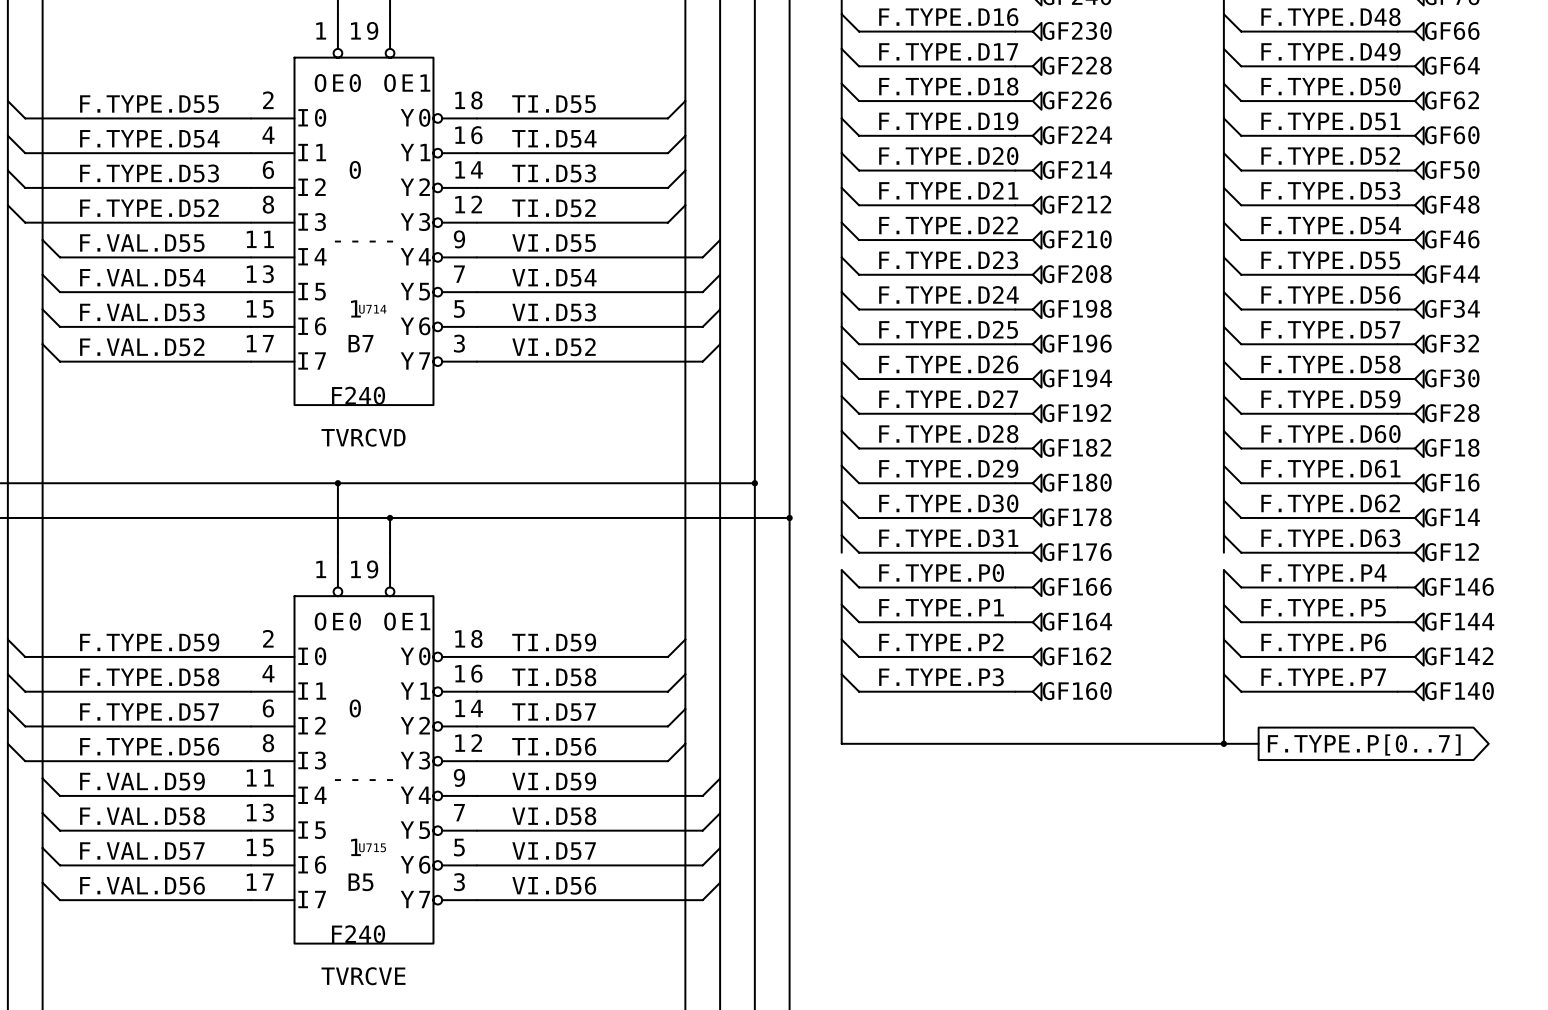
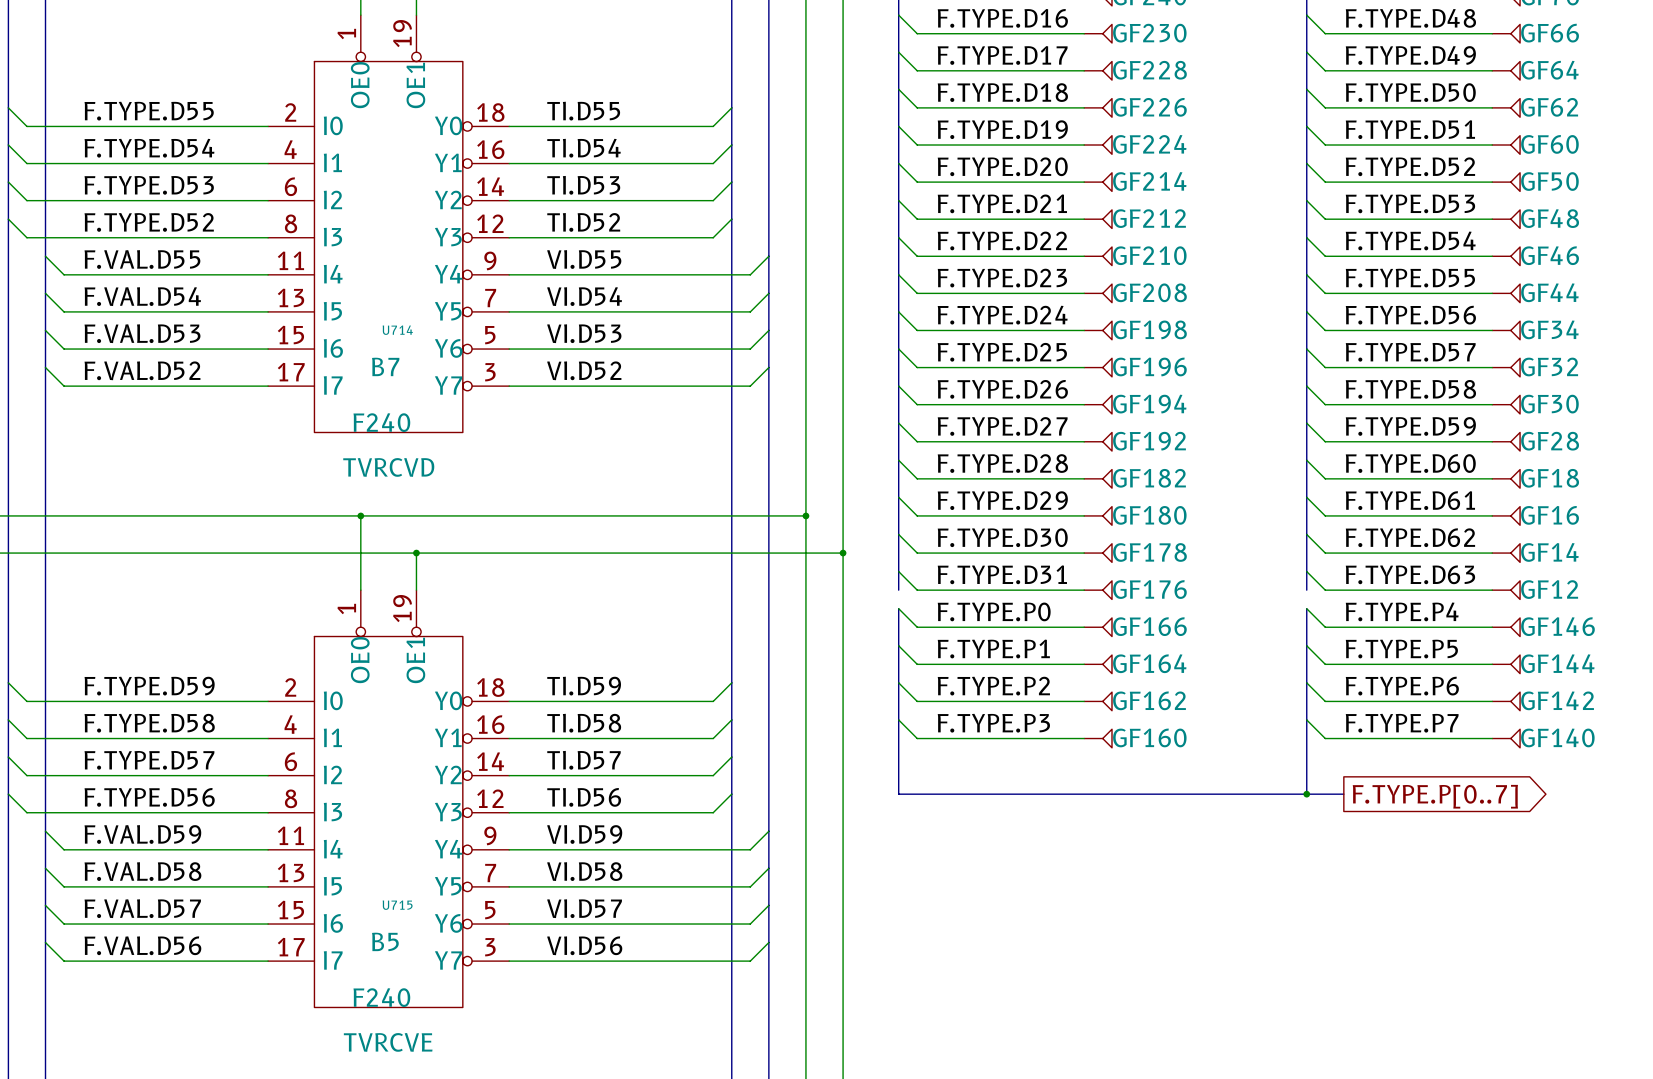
U714 symbol: [251, 14, 477, 406] -> [268, 15, 510, 433]
U715 symbol: [251, 552, 477, 944] -> [268, 590, 510, 1008]

